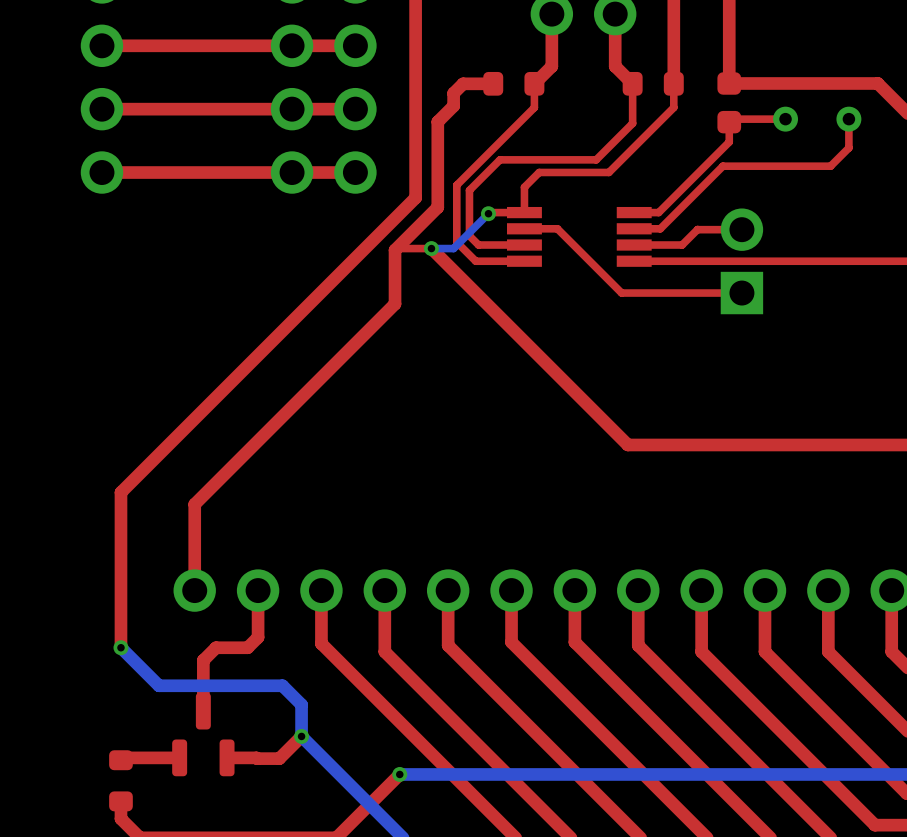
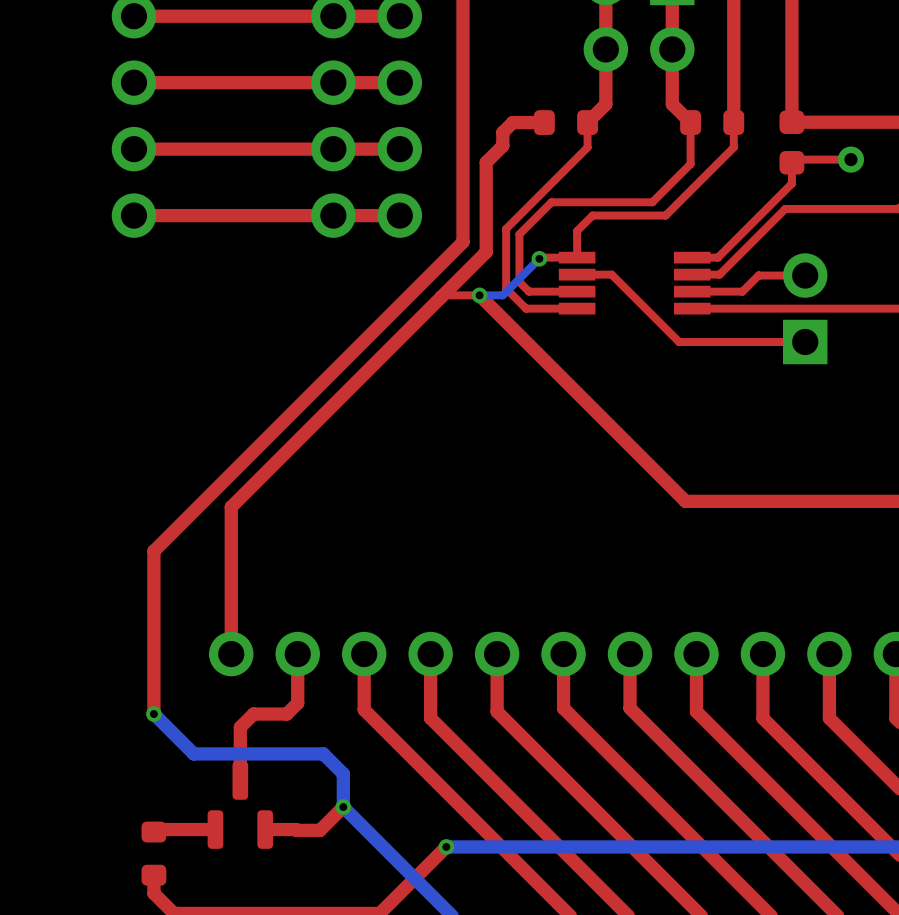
top track: (395, 250) (395, 304) (194, 504) -> (441, 297) (231, 507) (231, 563)

